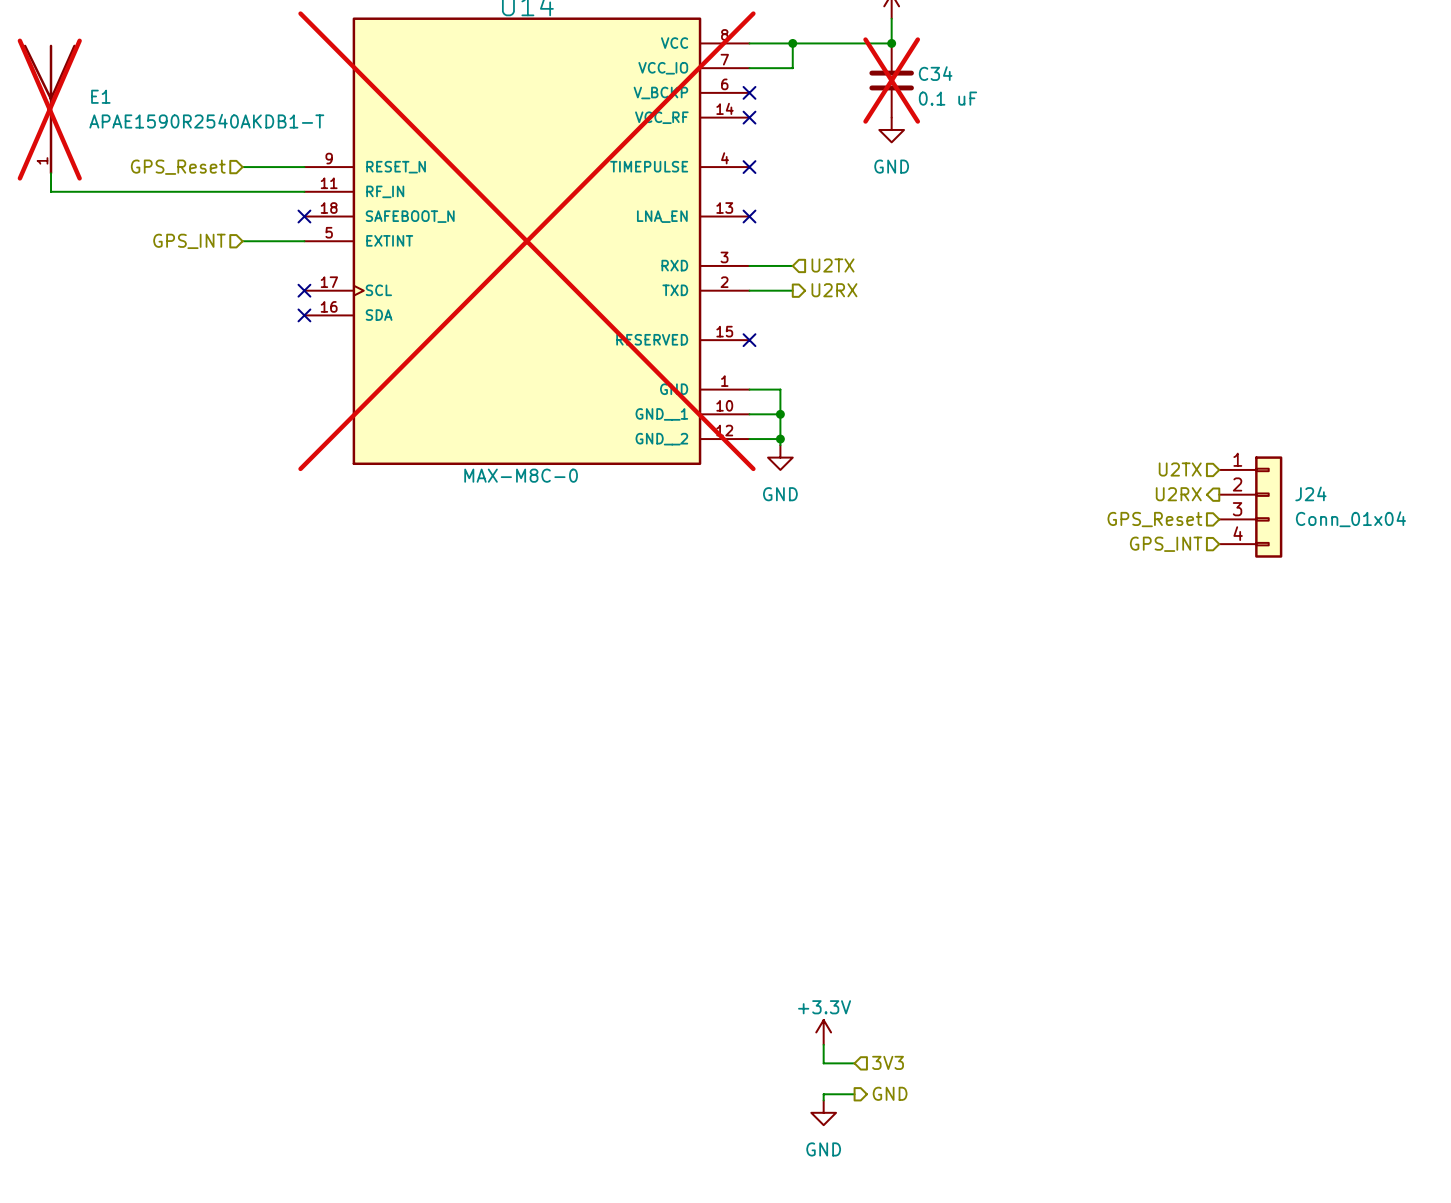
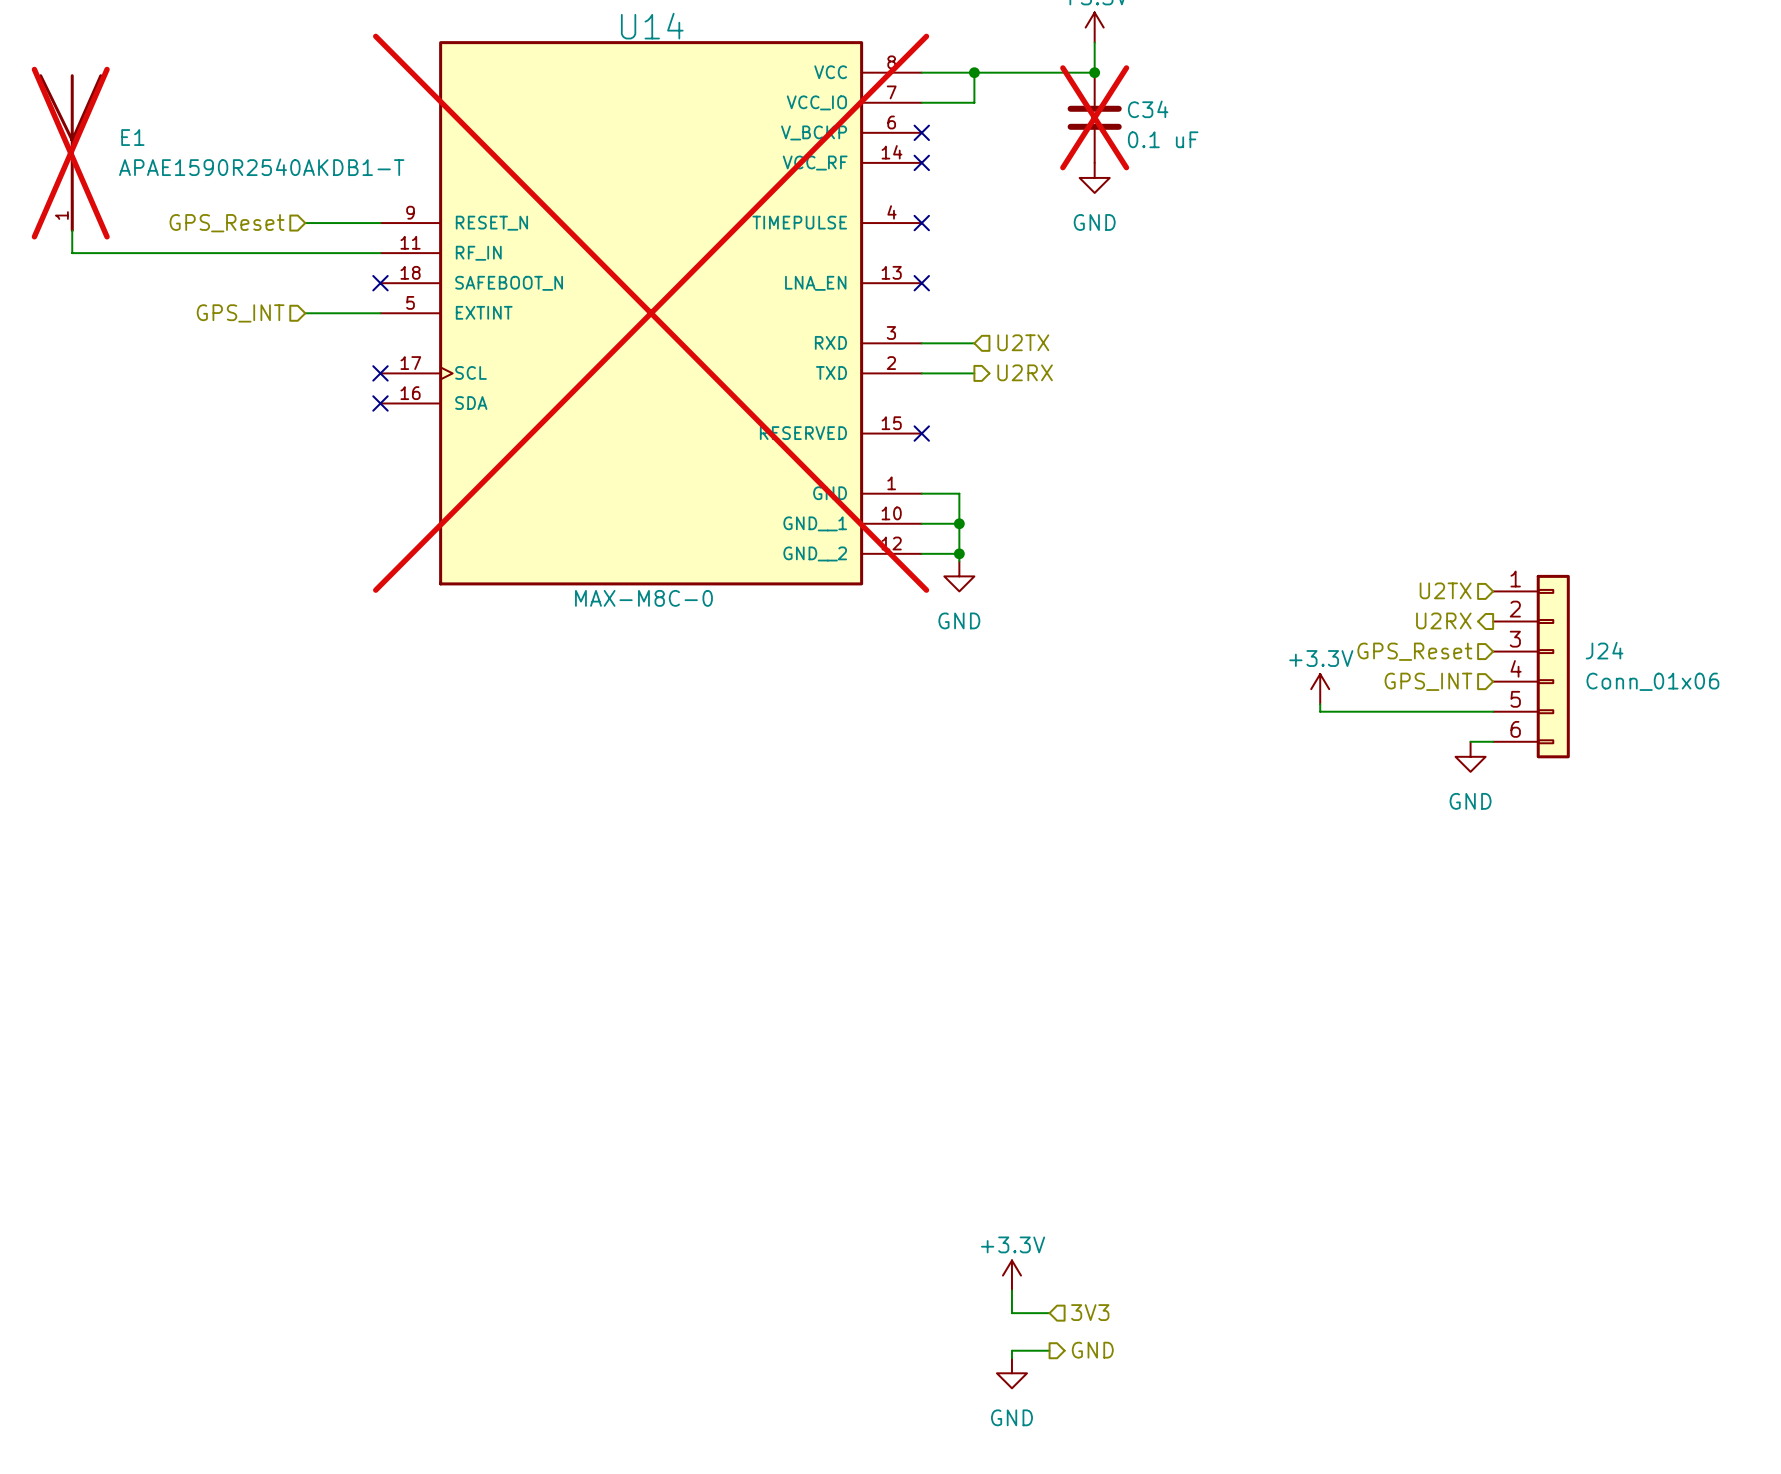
J24 symbol: [1219, 456, 1283, 558] -> [1493, 574, 1570, 759]
J24 value: Conn_01x04 (1350, 519) -> Conn_01x06 (1652, 681)
power symbol: none -> +3.3V (1320, 689)
wire: none -> (1320, 704) (1320, 711) (1493, 711)
wire: none -> (1470, 741) (1493, 741)
power symbol: none -> GND (1470, 756)

